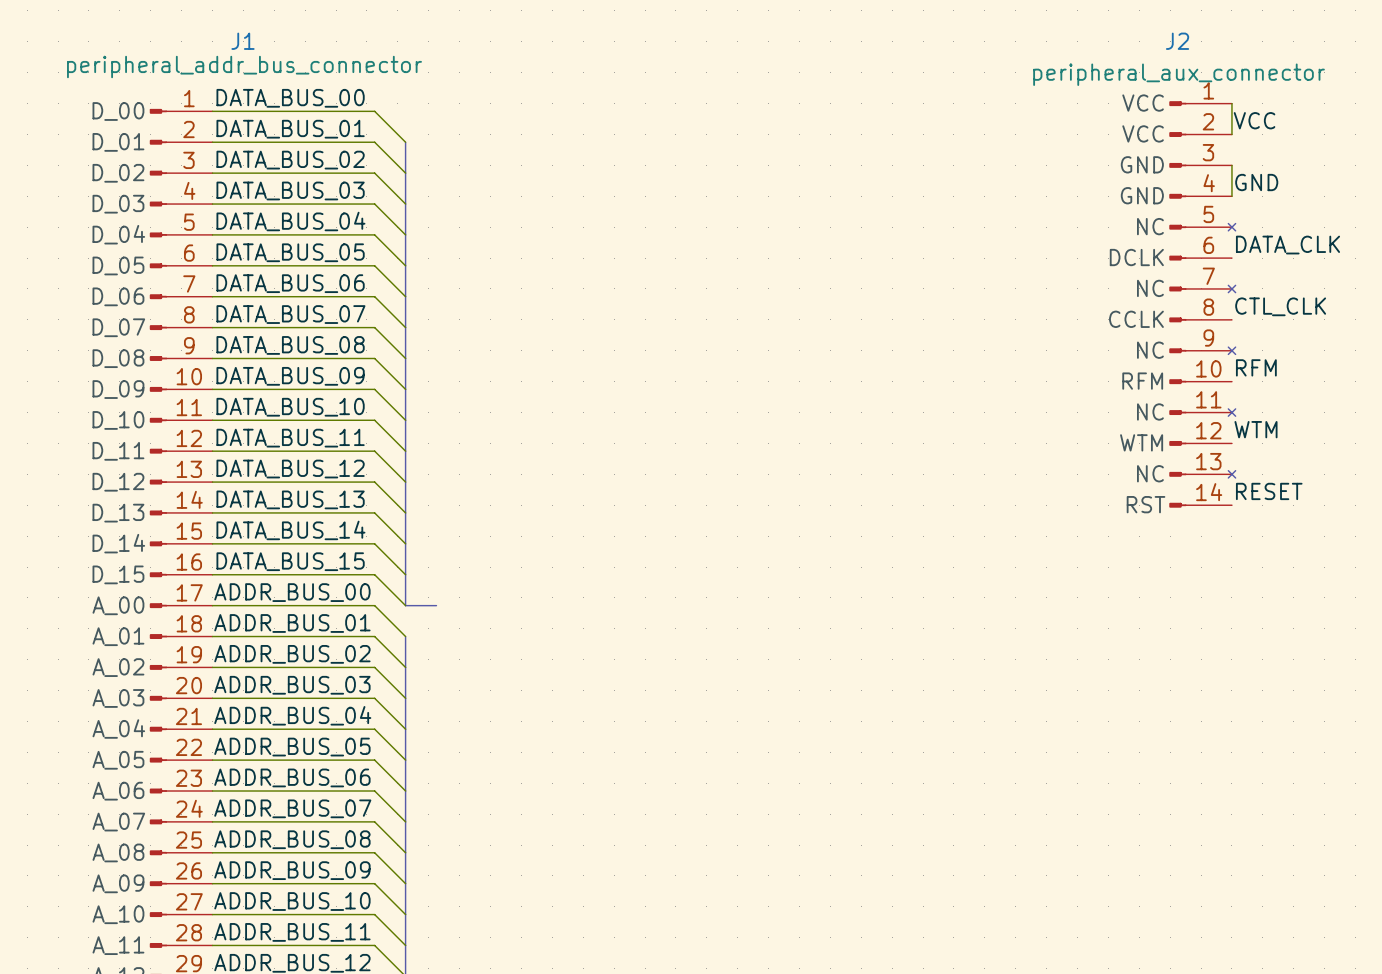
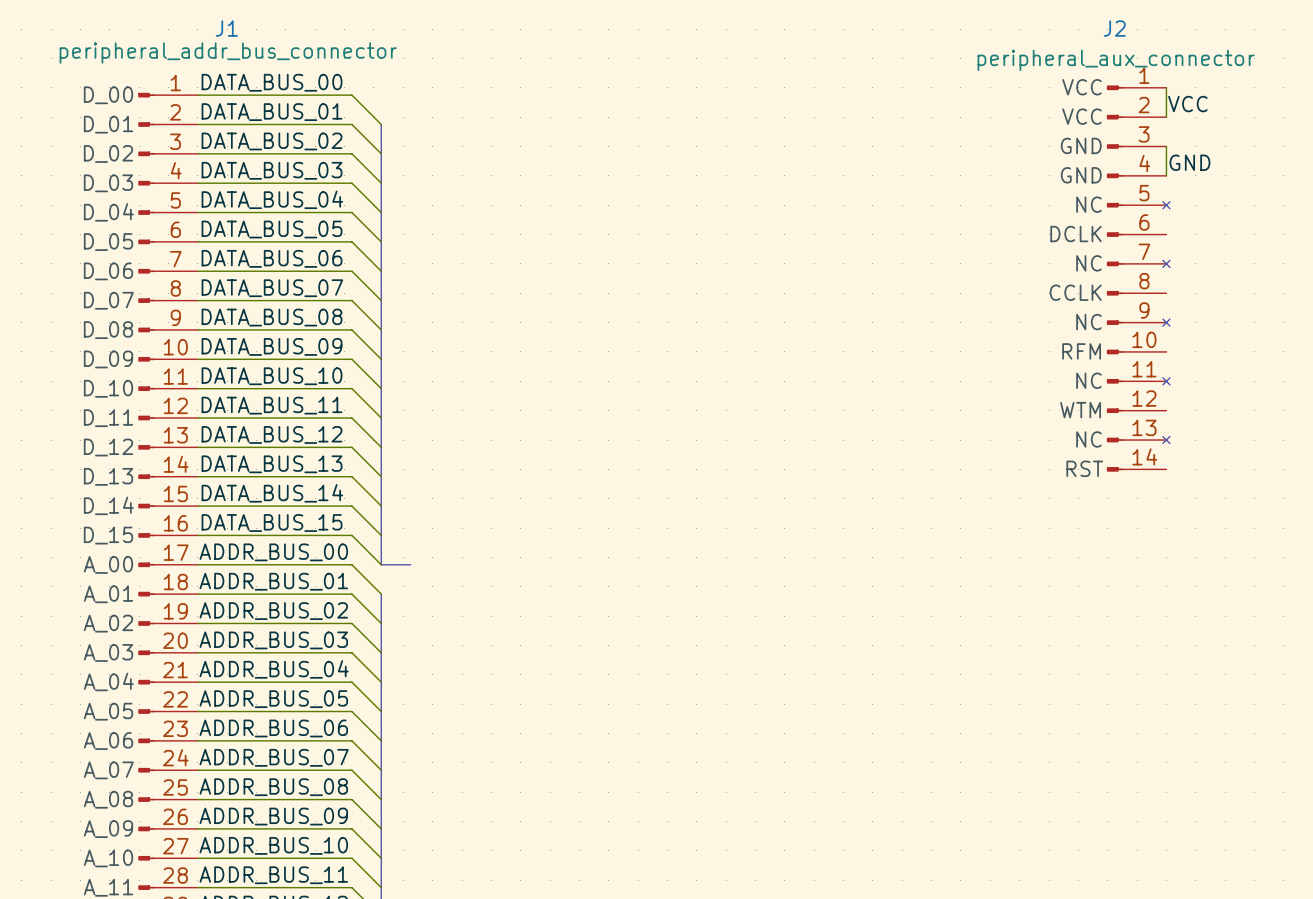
label: DATA_CLK (1287, 245) -> none
label: CTL_CLK (1280, 306) -> none
label: RFM (1256, 367) -> none
label: WTM (1255, 429) -> none
label: RESET (1269, 491) -> none

